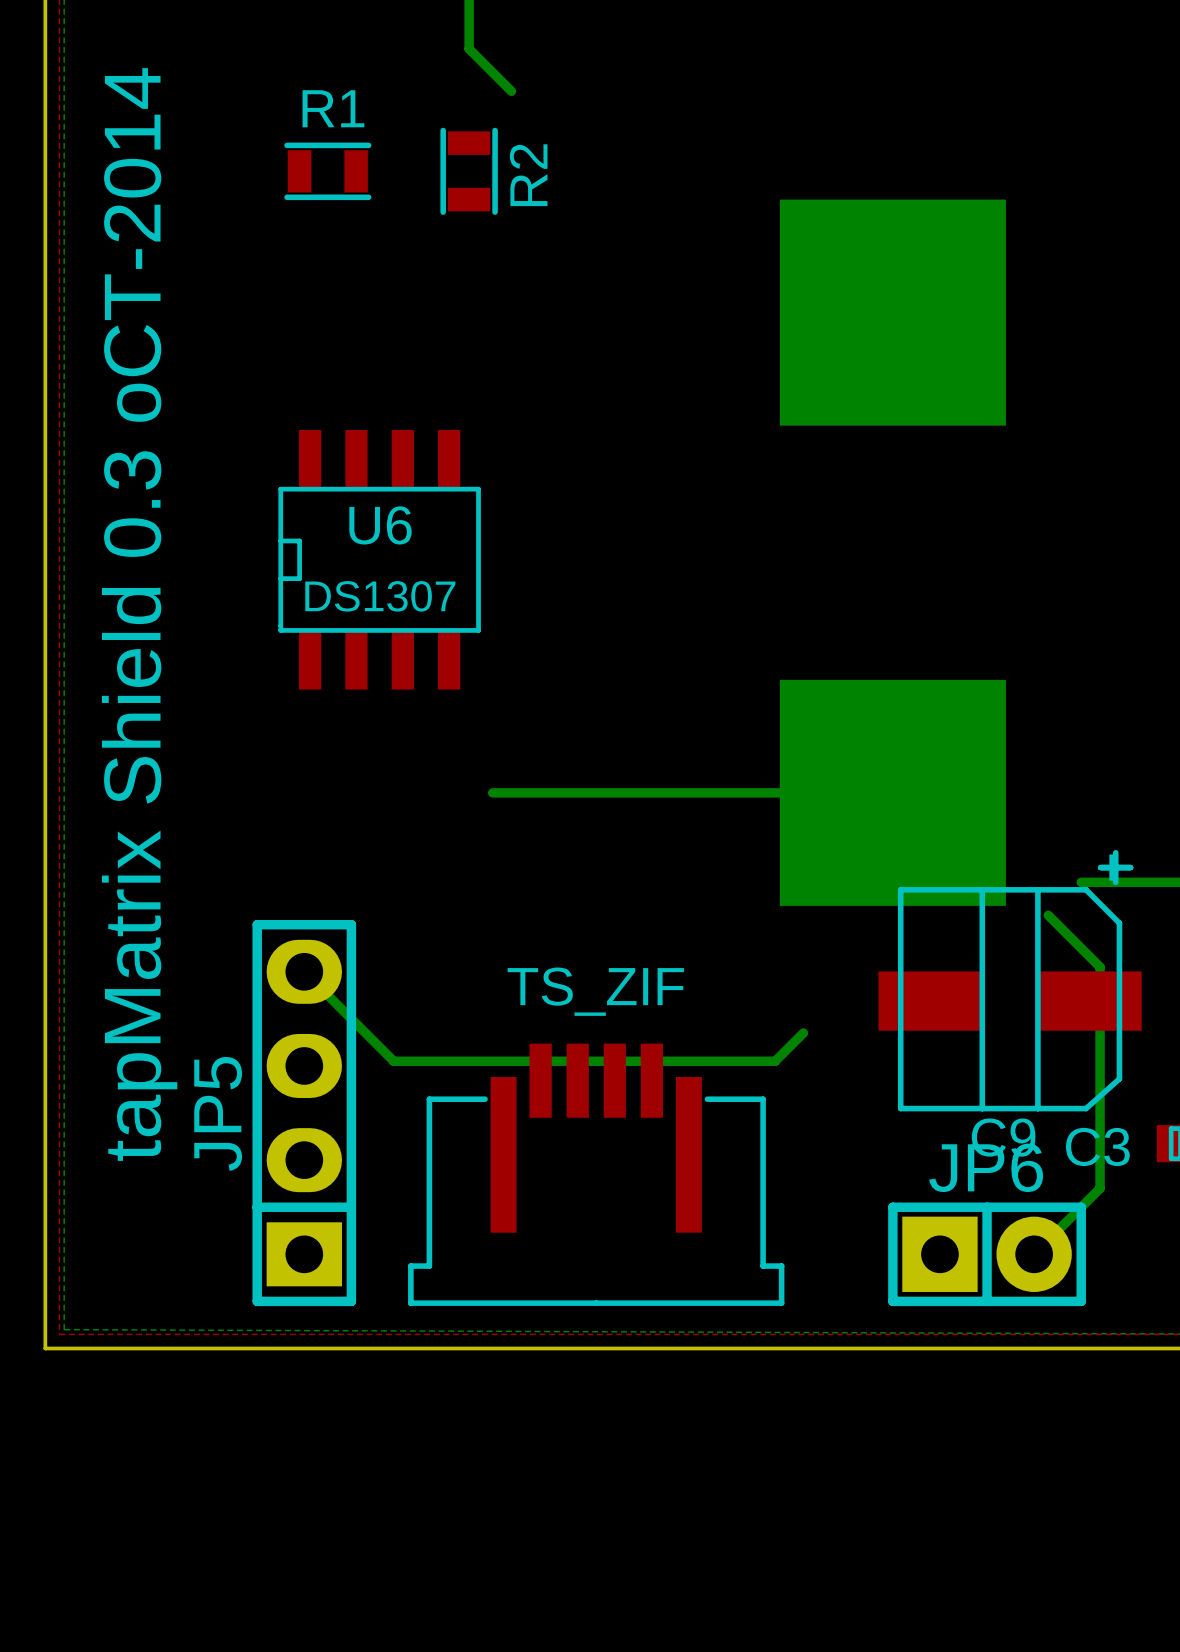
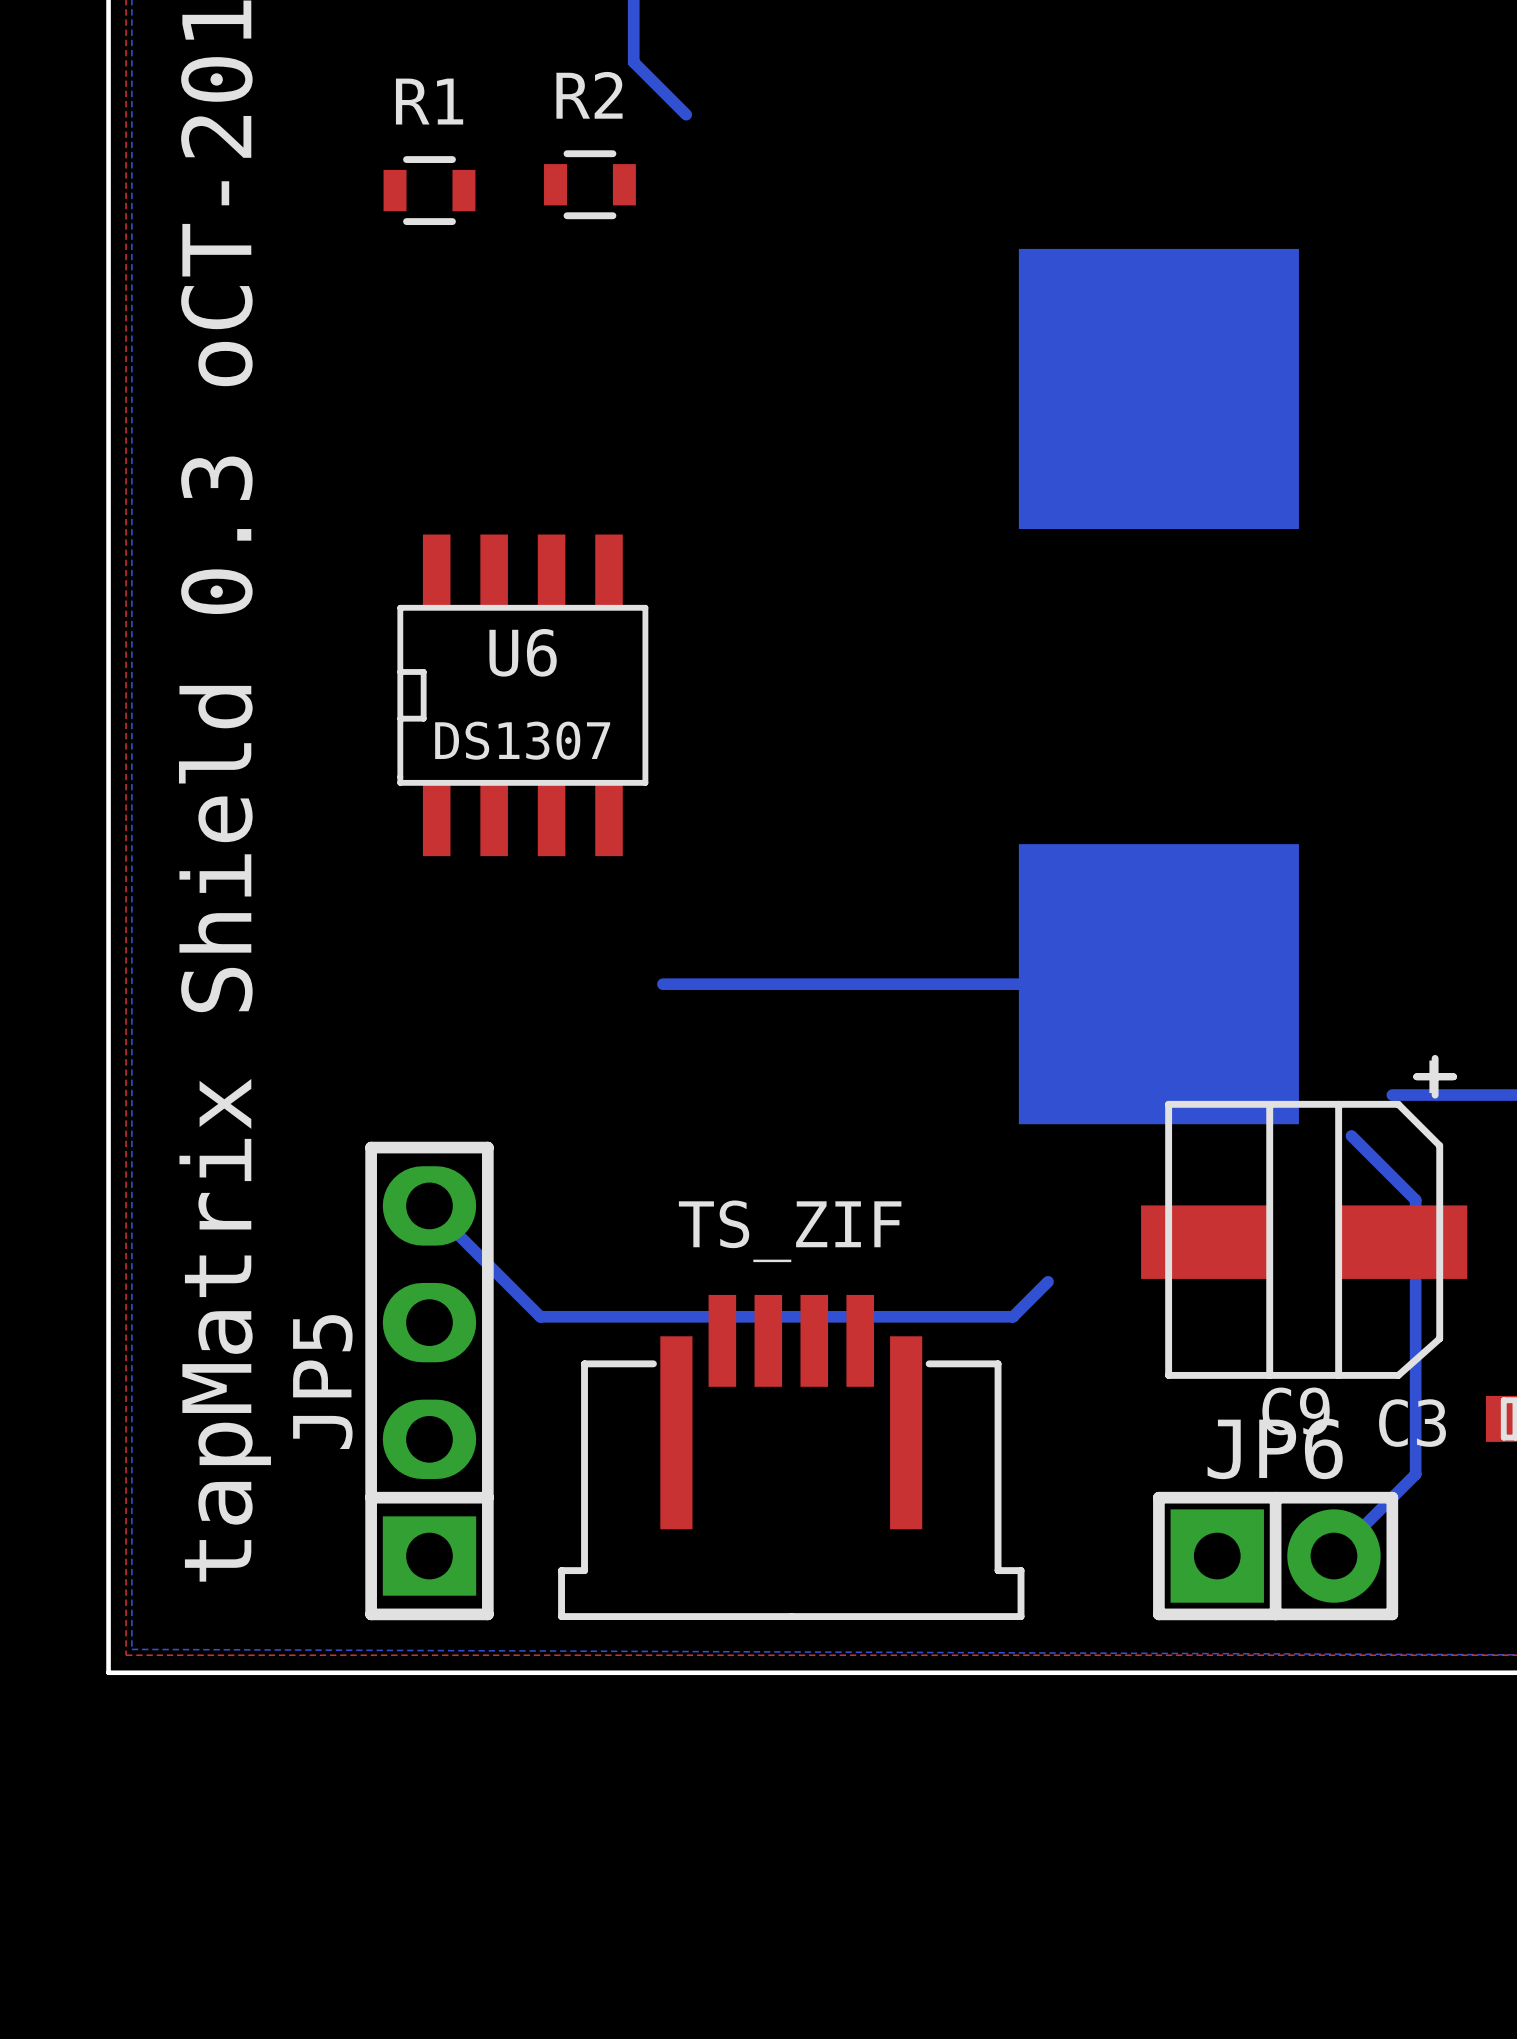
R2 footprint: [440, 127, 498, 215] -> [544, 150, 636, 220]
R1 footprint: [284, 142, 372, 201] -> [383, 156, 476, 226]
R2 name position: R2 (528, 175) -> R2 (589, 95)

